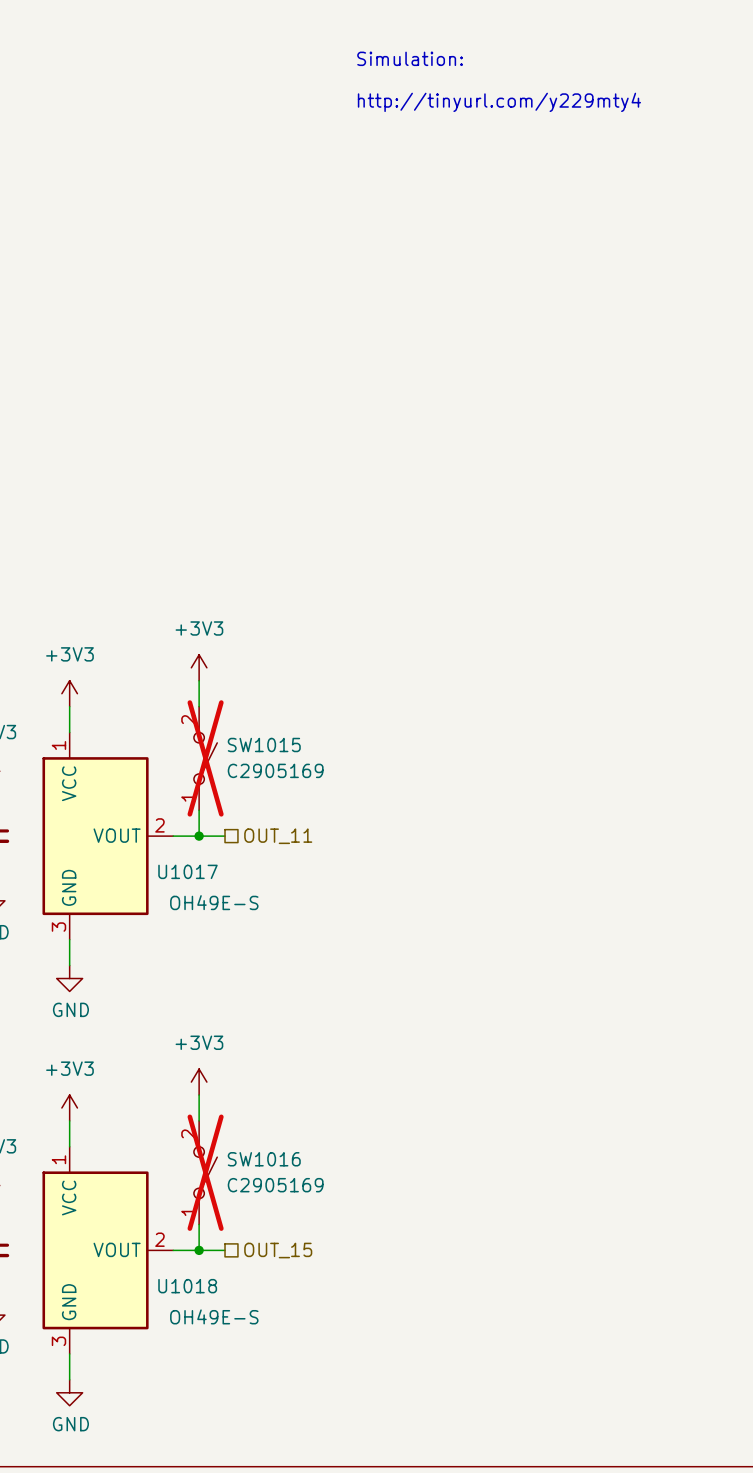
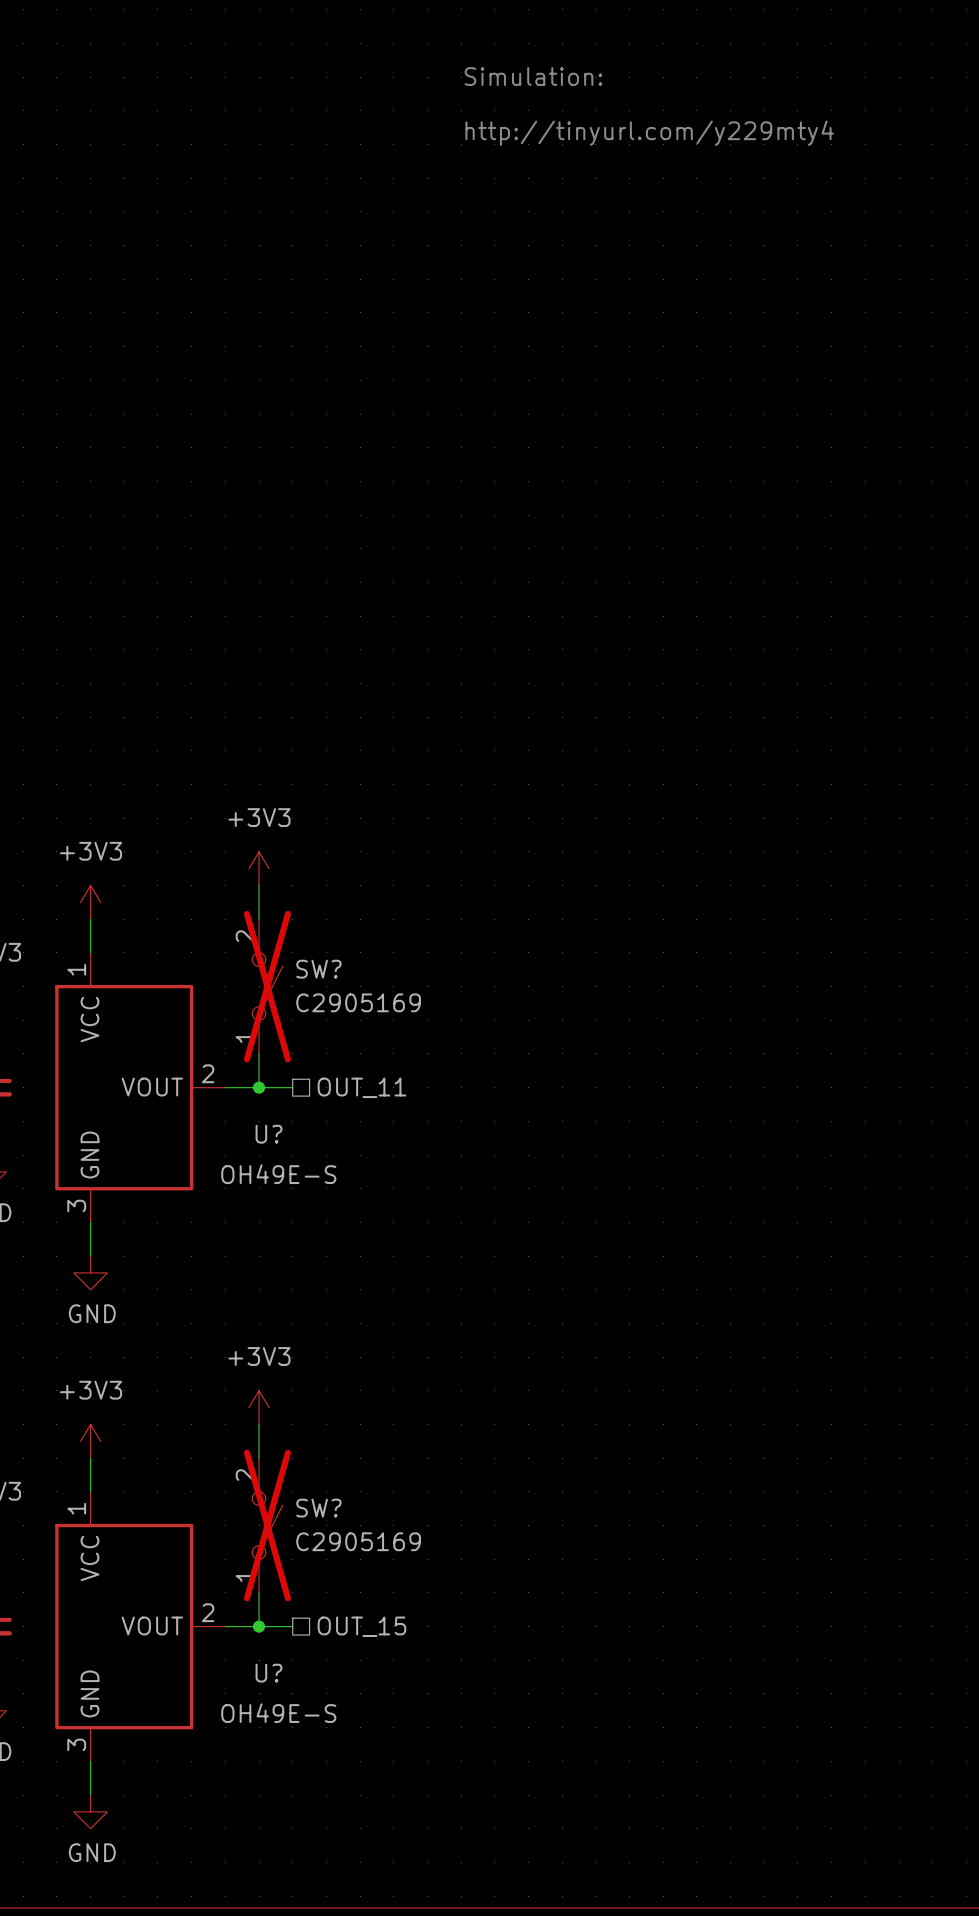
SW1015 name: SW1015 (264, 745) -> SW? (318, 969)
U1017 name: U1017 (187, 871) -> U? (269, 1134)
SW1016 name: SW1016 (264, 1159) -> SW? (318, 1508)
U1018 name: U1018 (187, 1286) -> U? (269, 1673)

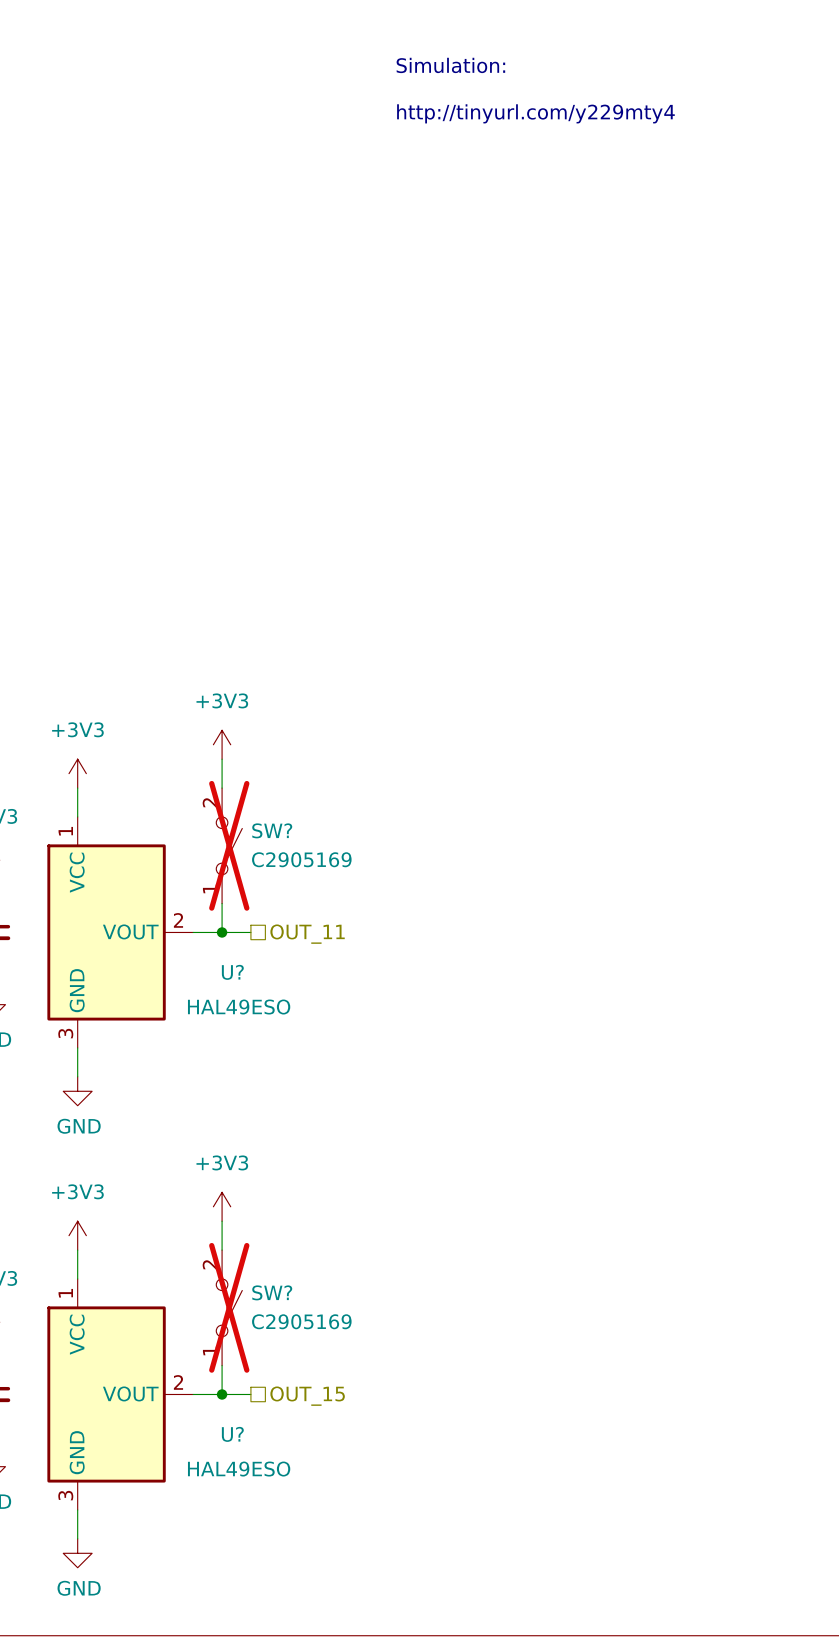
U? value: OH49E-S (278, 1174) -> HAL49ESO (239, 1007)
U? value: OH49E-S (278, 1713) -> HAL49ESO (239, 1469)

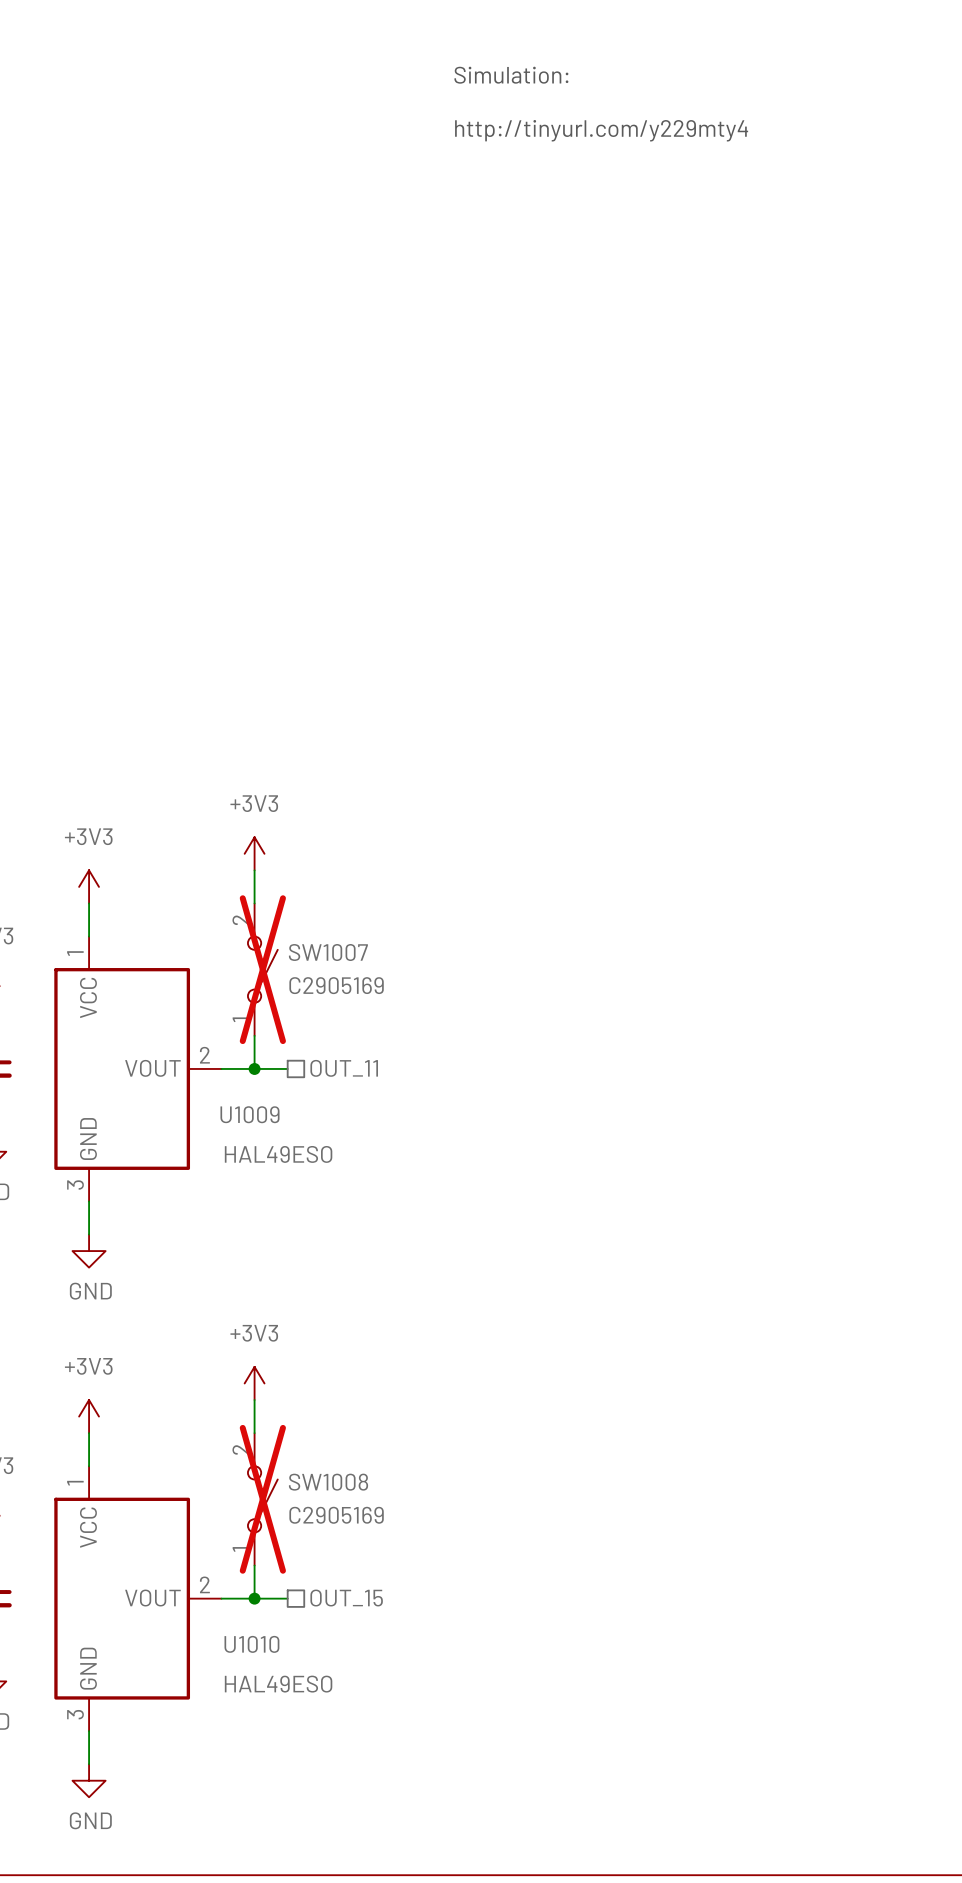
SW? name: SW? (272, 830) -> SW1007 (328, 952)
U? name: U? (232, 972) -> U1009 (249, 1114)
SW? name: SW? (272, 1292) -> SW1008 (328, 1482)
U? name: U? (232, 1434) -> U1010 (251, 1644)

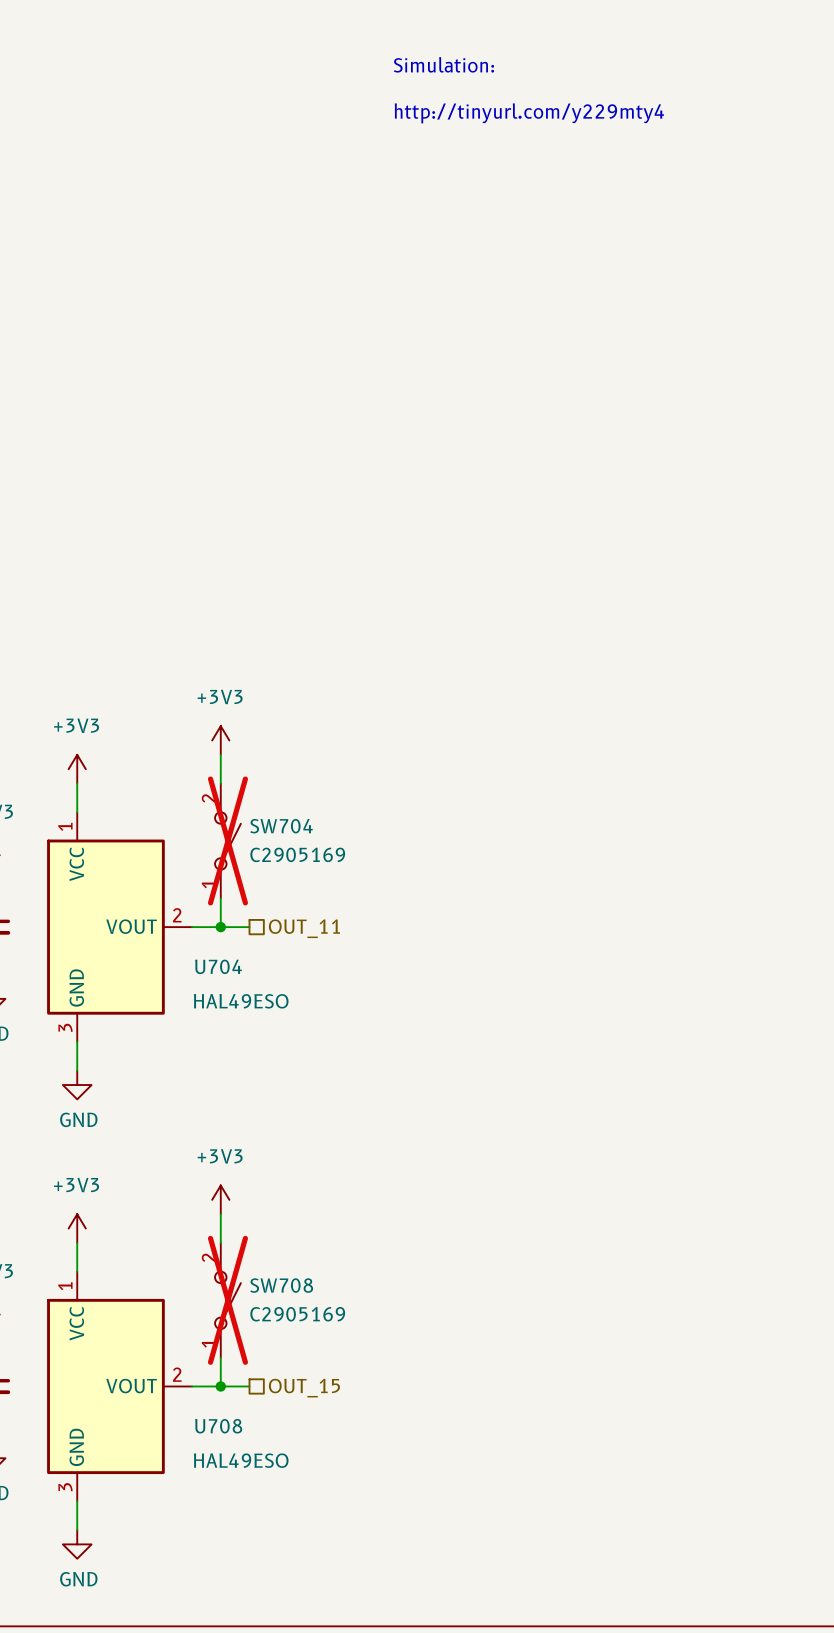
SW1007 name: SW1007 (328, 952) -> SW704 (281, 826)
U1009 name: U1009 (249, 1114) -> U704 (218, 966)
SW1008 name: SW1008 (328, 1482) -> SW708 (281, 1285)
U1010 name: U1010 (251, 1644) -> U708 (218, 1426)

